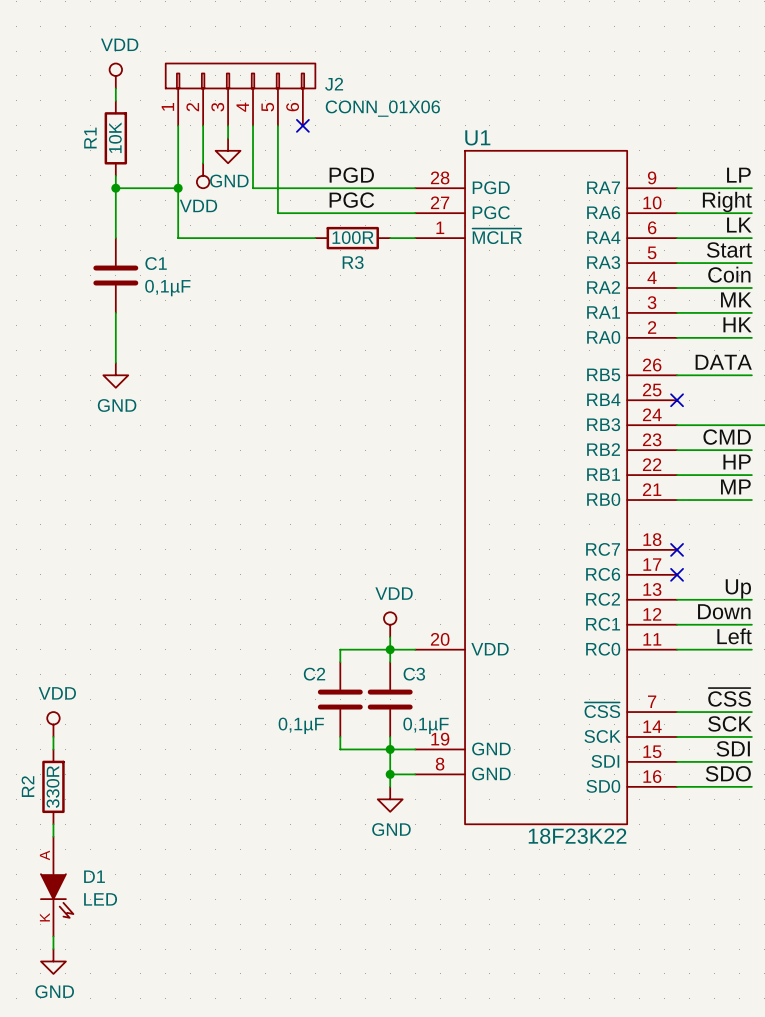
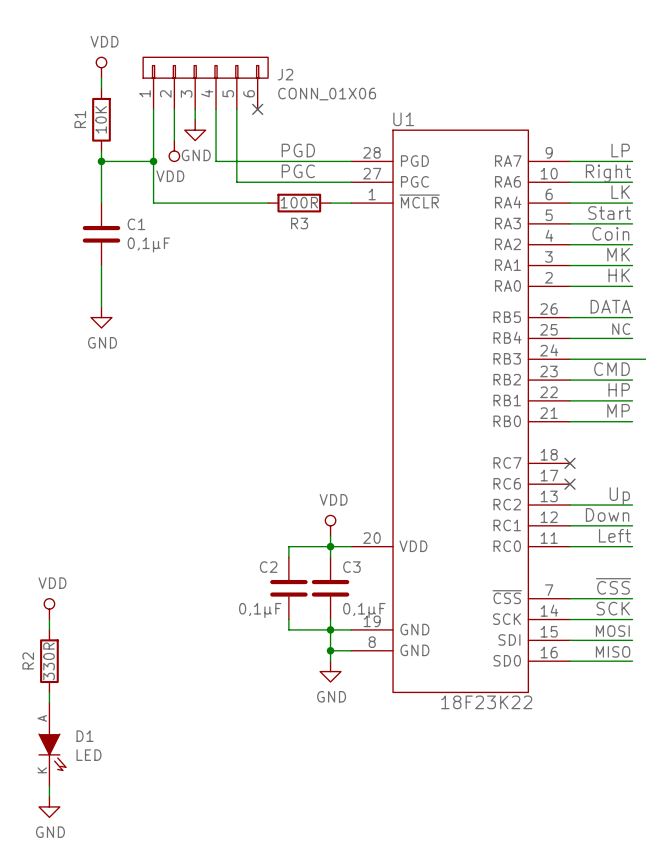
label: none -> NC (621, 329)
wire: none -> (570, 338) (632, 338)
no-connect mark: (677, 400) -> none
label: SDI (733, 748) -> MOSI (612, 631)
label: SDO (728, 773) -> MISO (613, 651)

